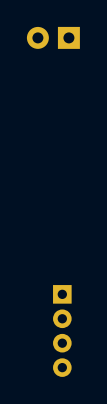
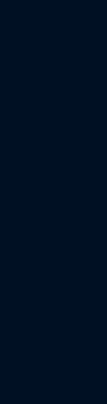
part: (53, 37) -> none
part: (62, 330) -> none

